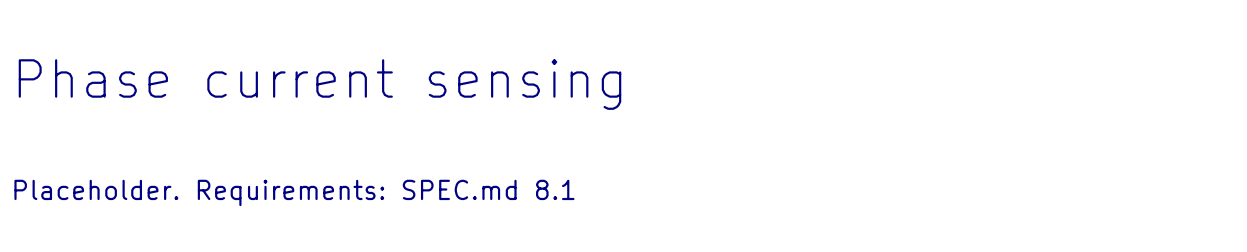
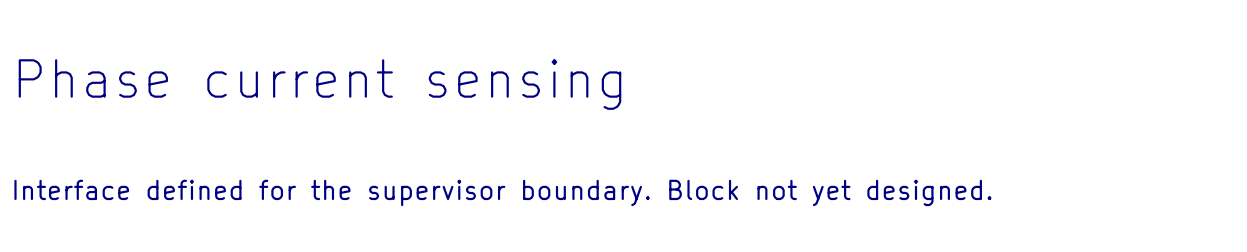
text: Placeholder. Requirements: SPEC.md 8.1 (294, 192) -> Interface defined for the supervisor boundary. Block not yet designed. (502, 192)

